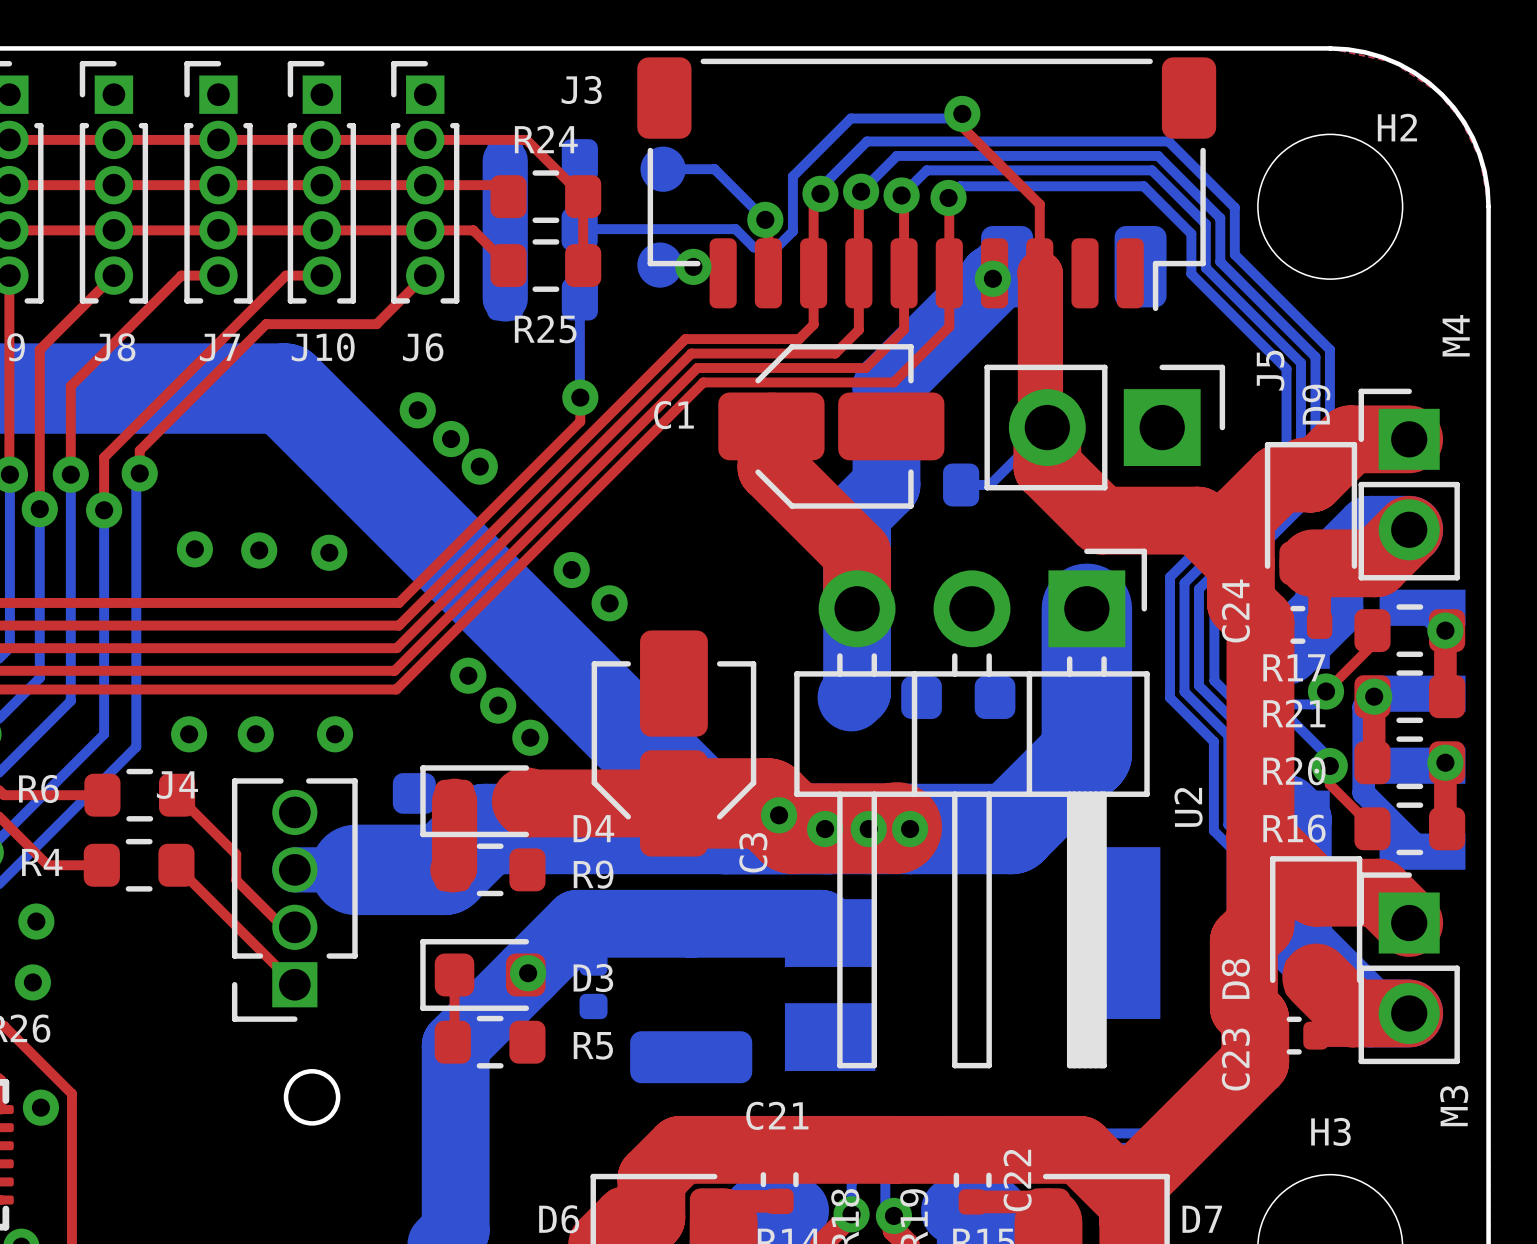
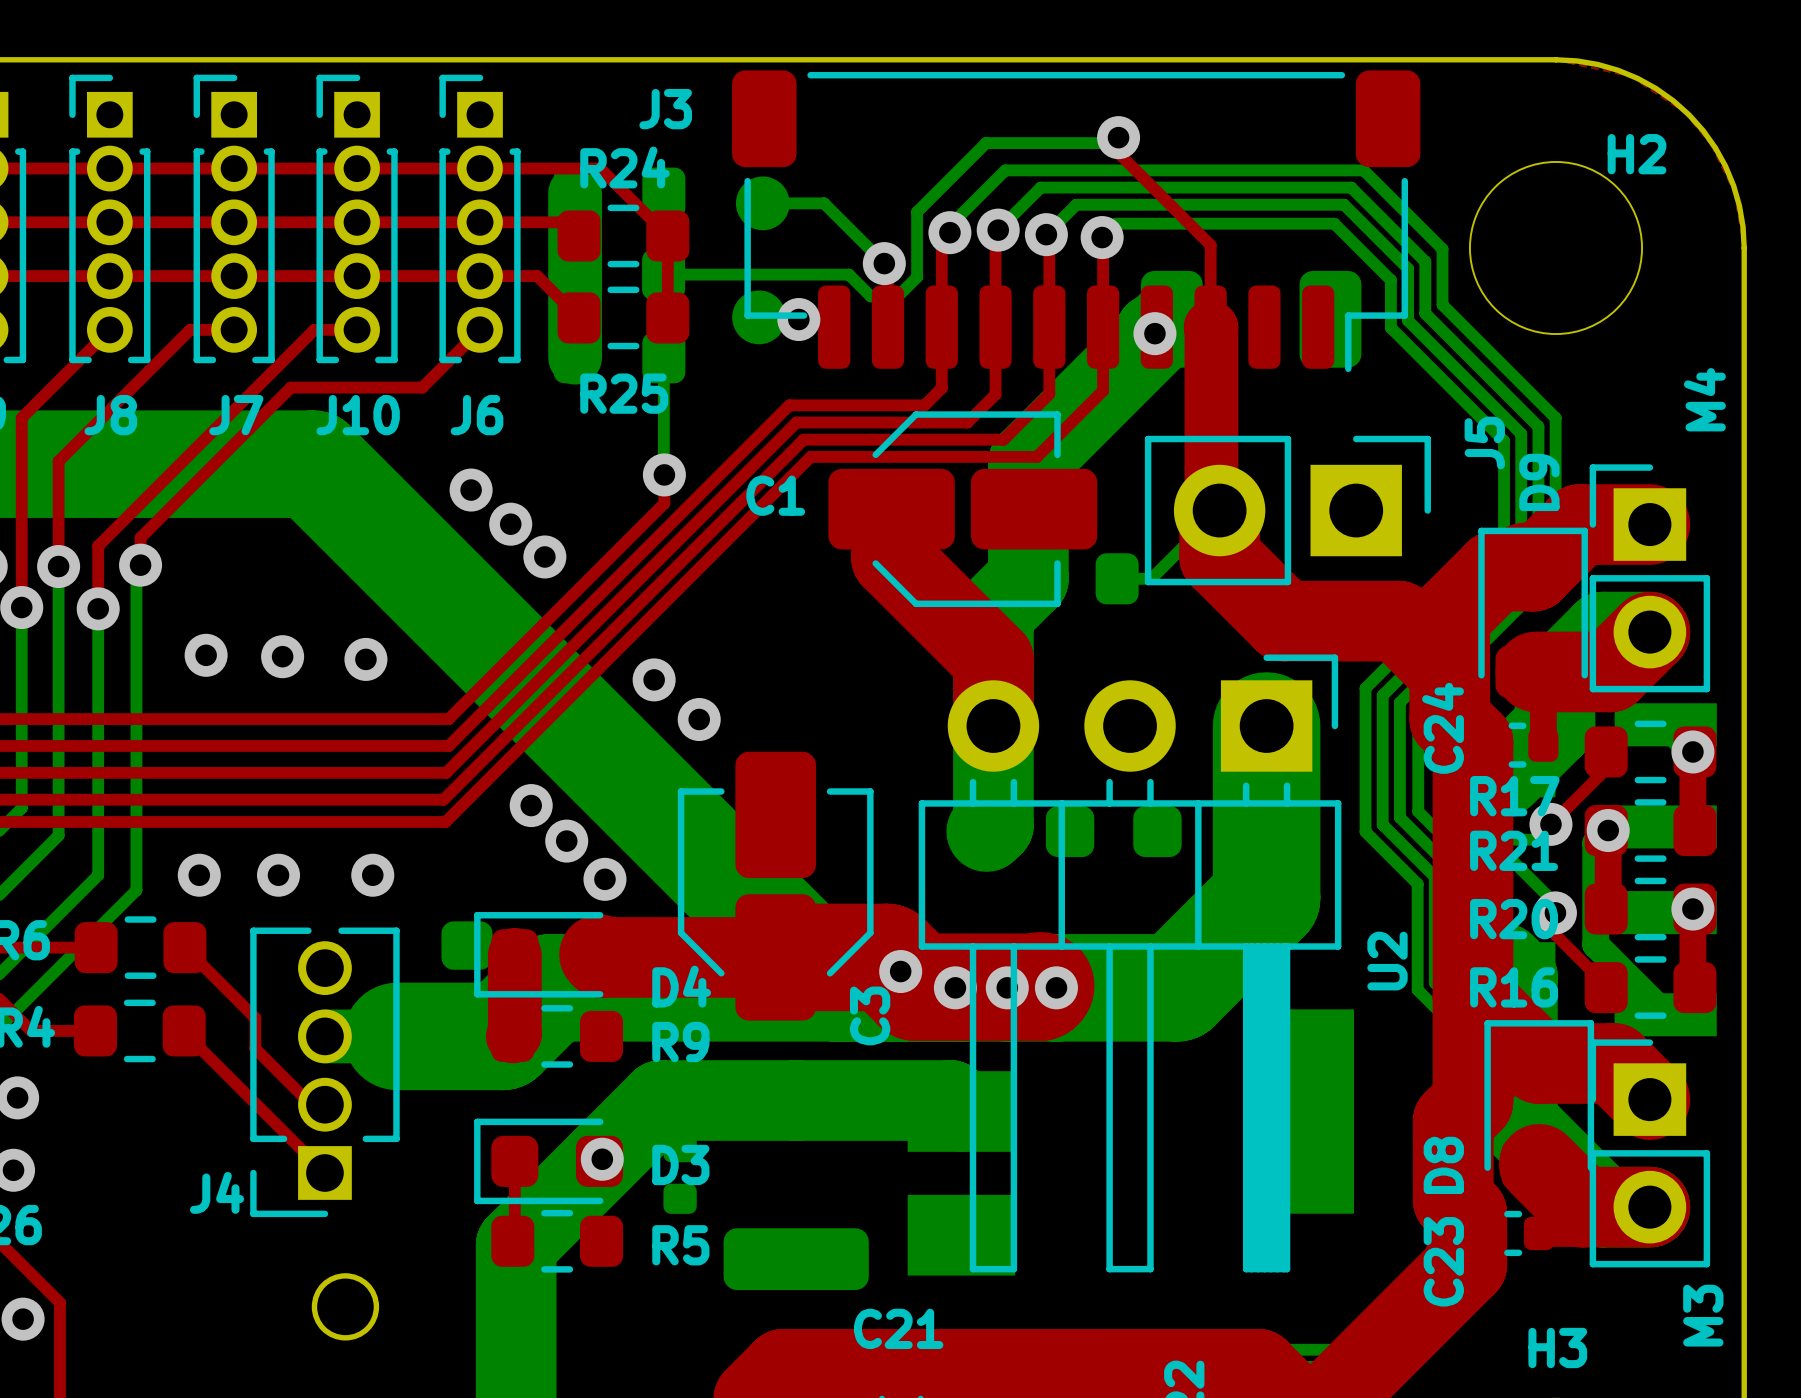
J4 name position: J4 (177, 785) -> J4 (217, 1192)

